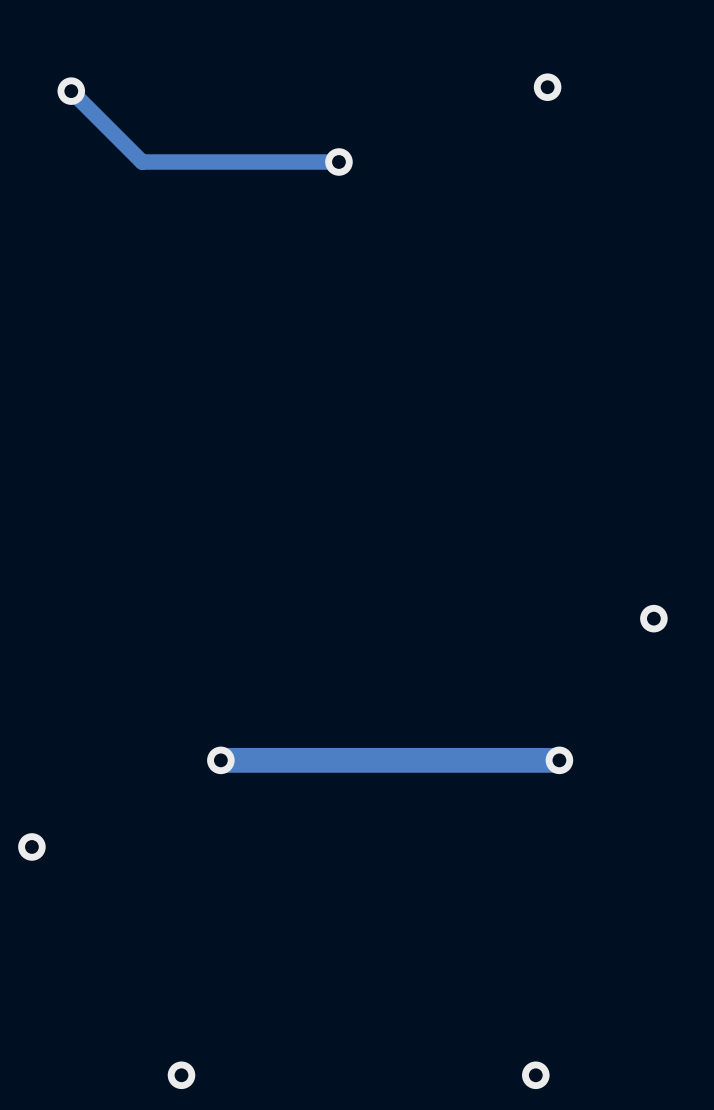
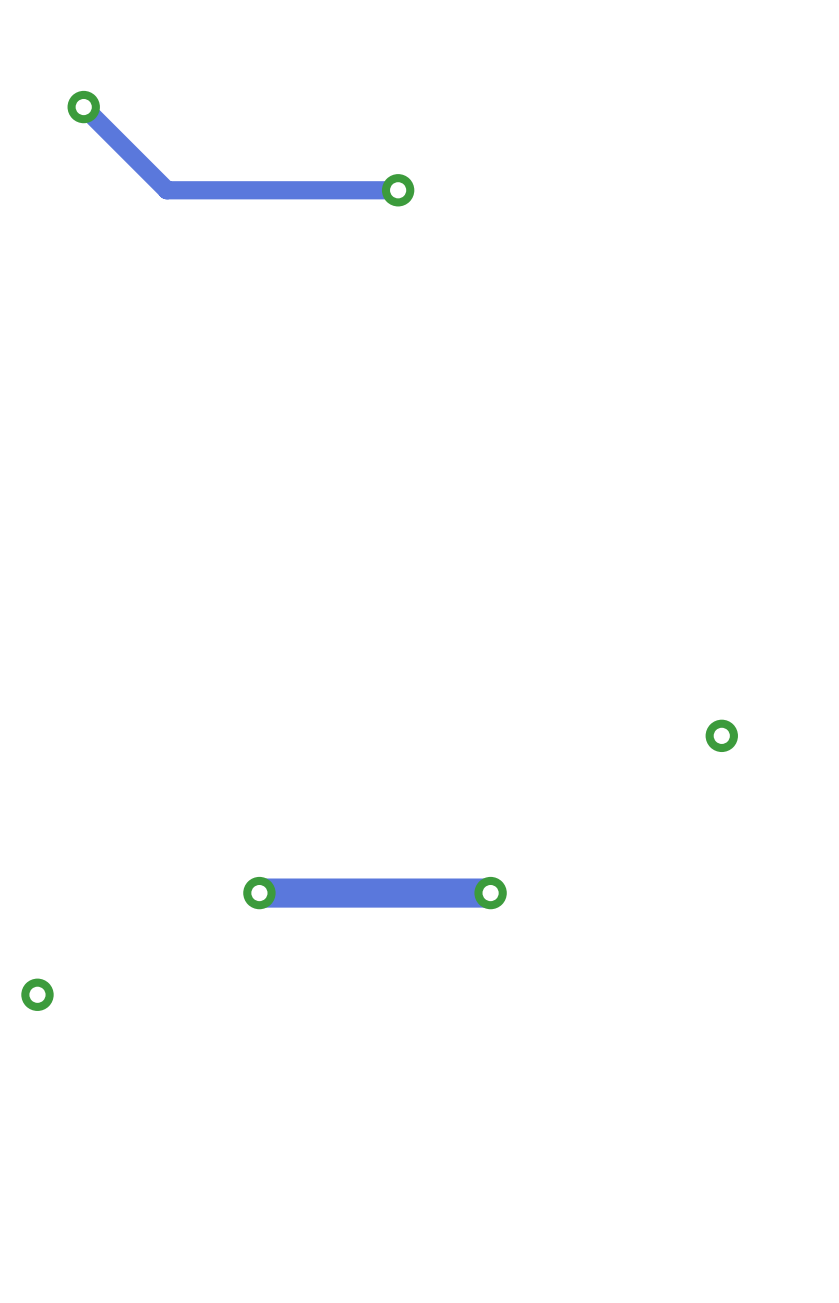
via: (547, 87) -> none
via position: (653, 618) -> (721, 735)
via: none -> (490, 893)
track: (559, 760) (417, 760) -> none
via: (559, 760) -> none
via: (181, 1075) -> none
via: (535, 1075) -> none

